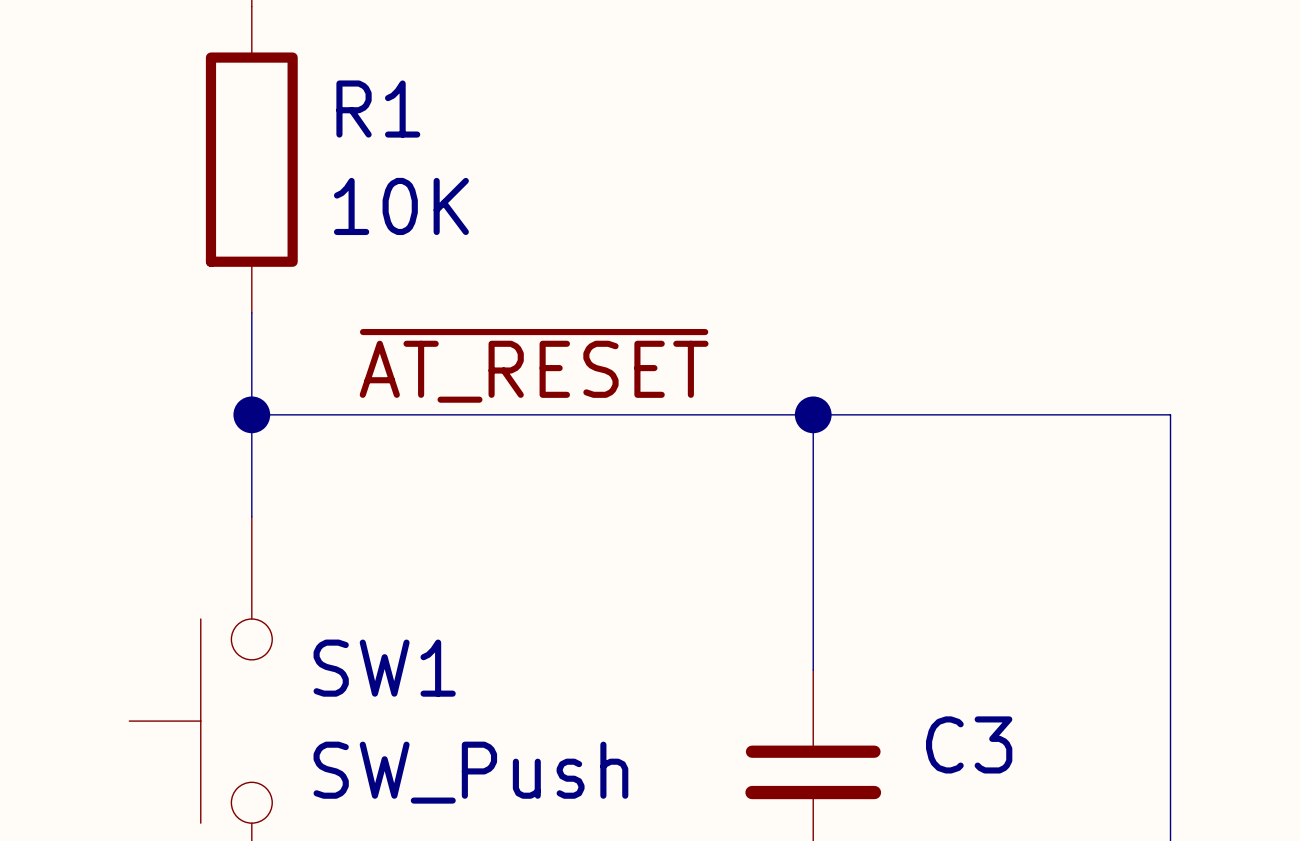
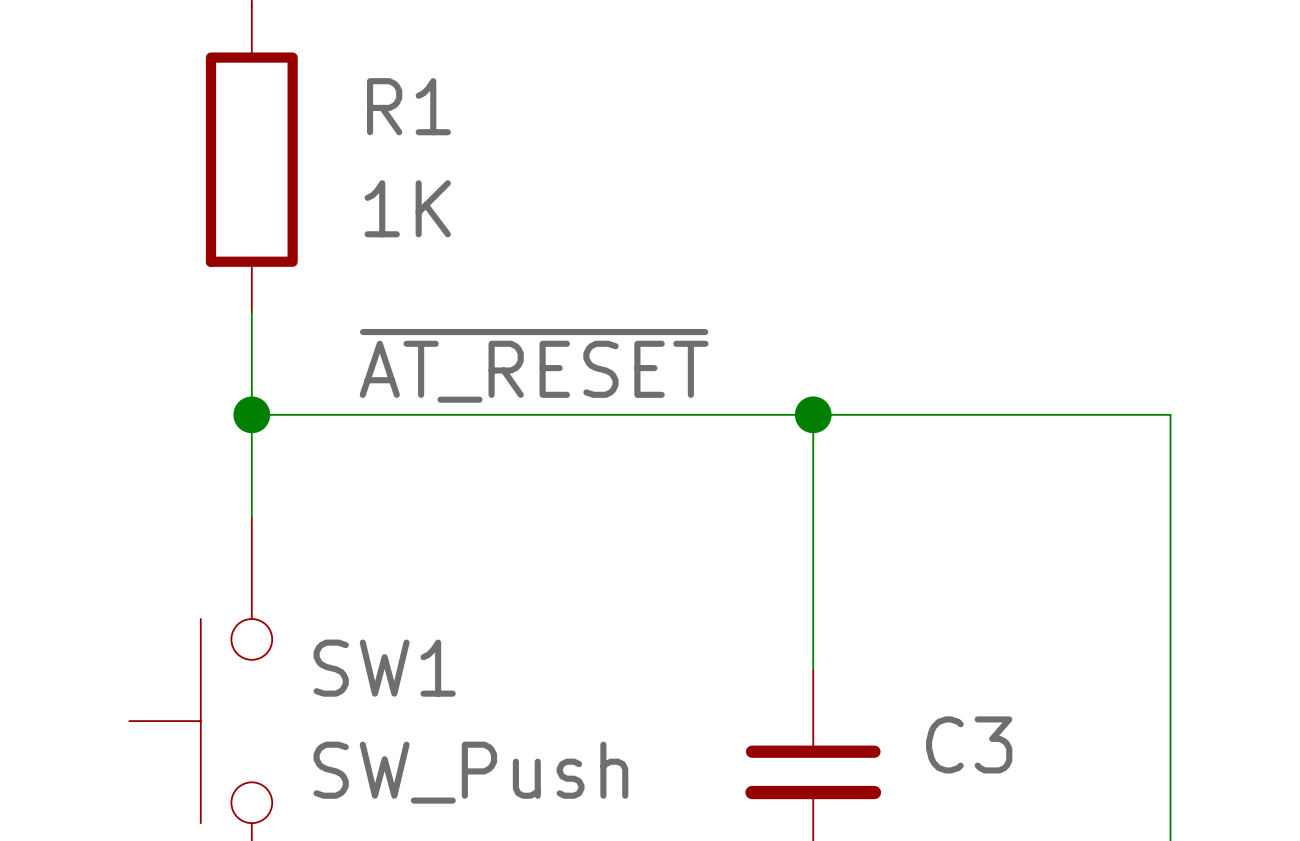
R1 name position: R1 (378, 109) -> R1 (408, 106)
R1 value: 10K (401, 206) -> 1K (407, 208)

